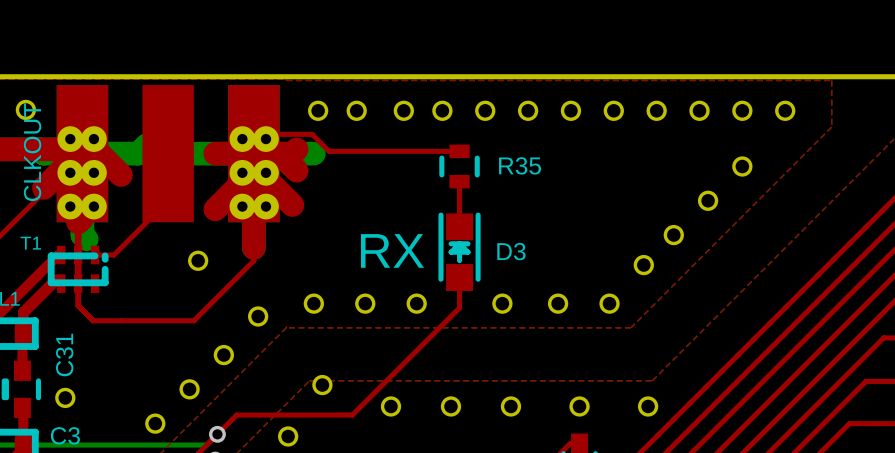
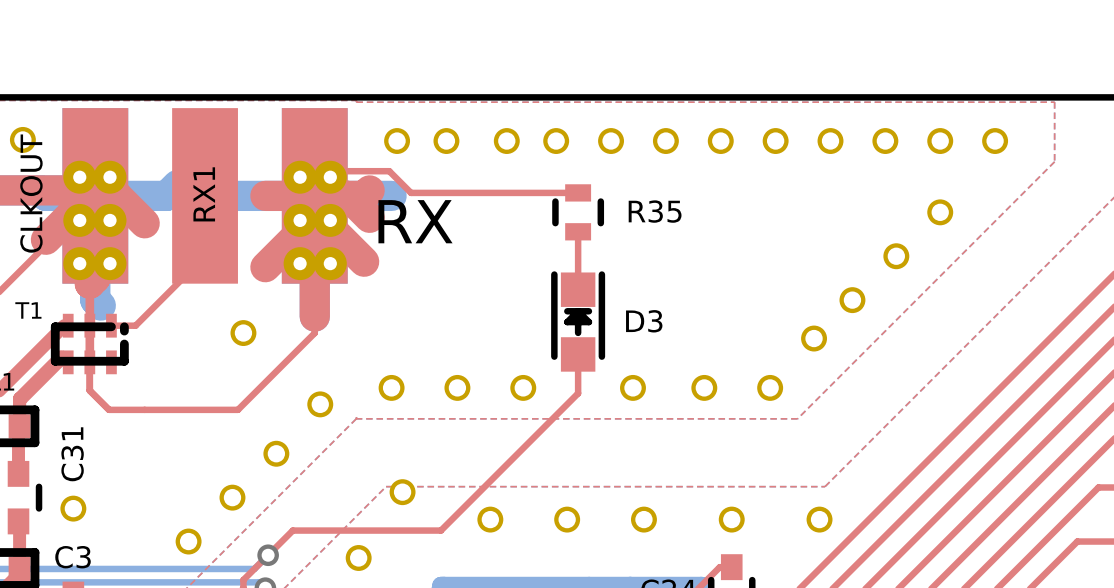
RX1 name: none -> RX1 (204, 194)
text position: RX (392, 250) -> RX (415, 221)

